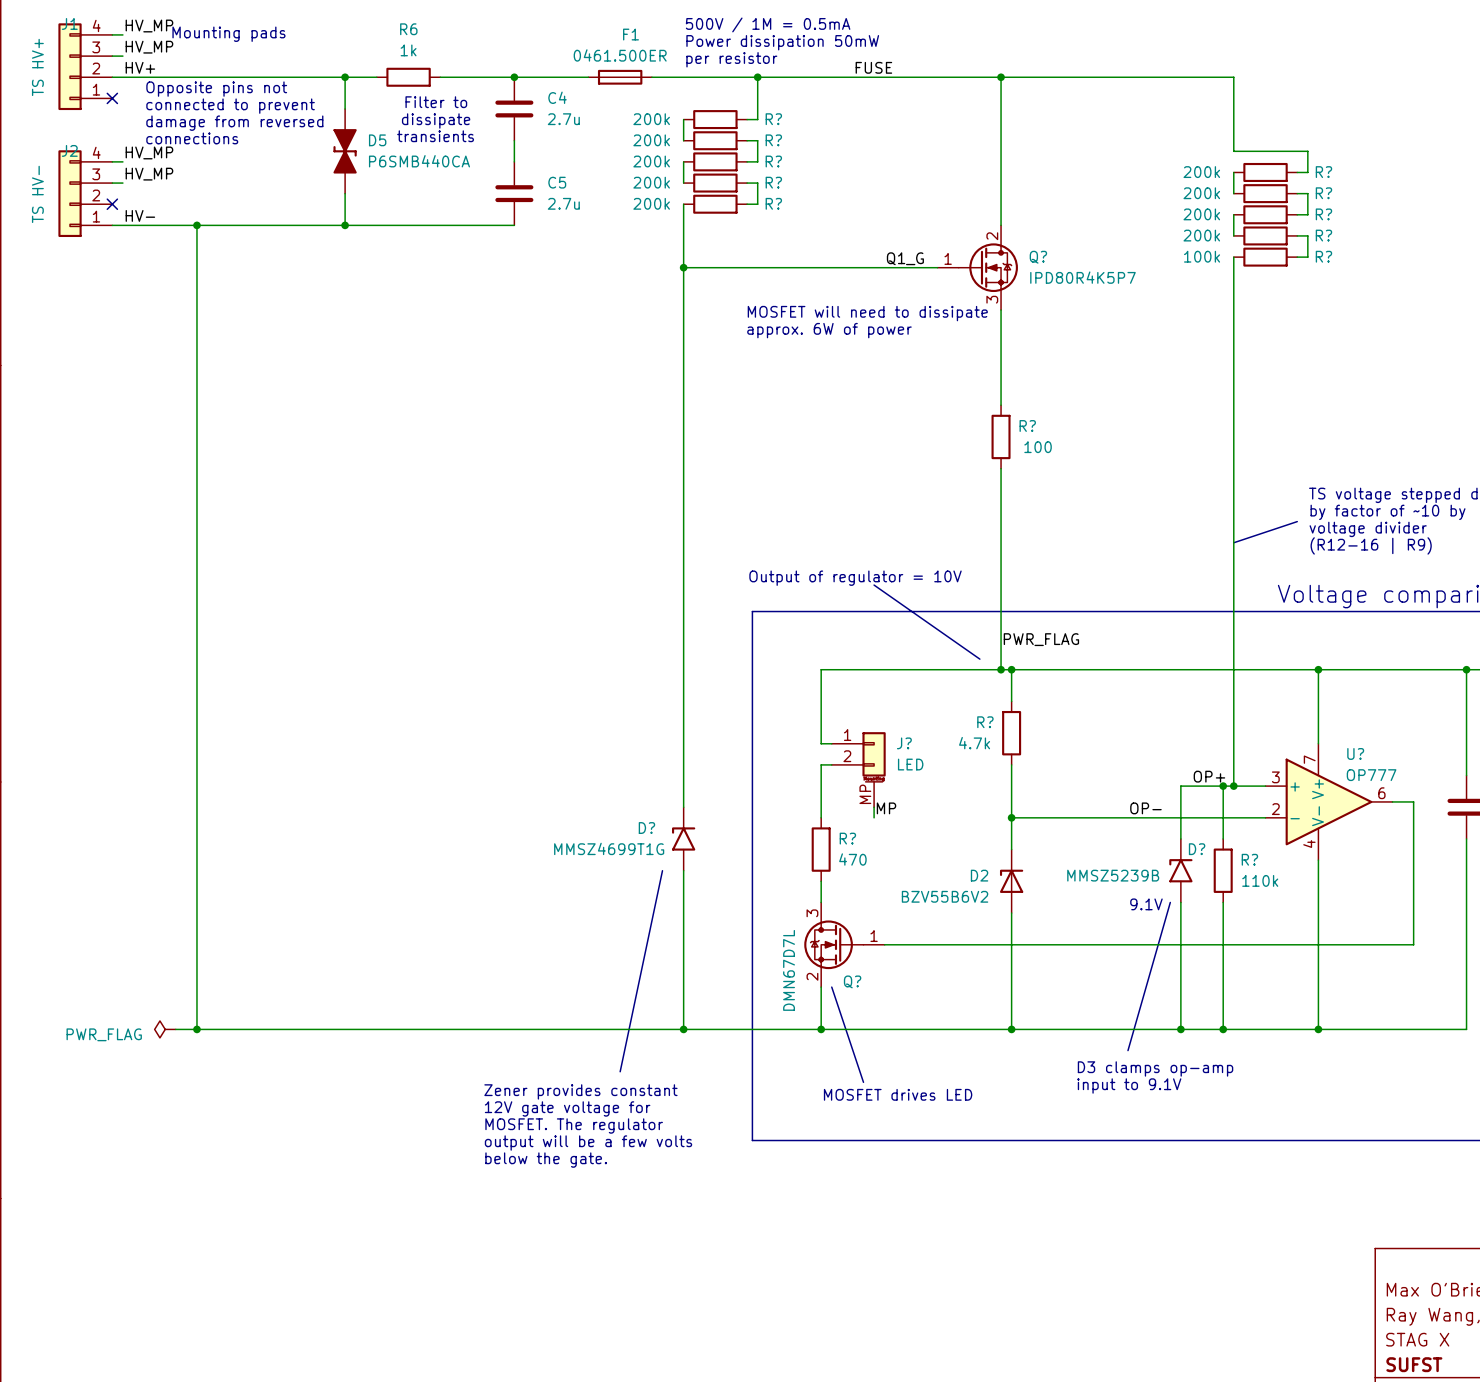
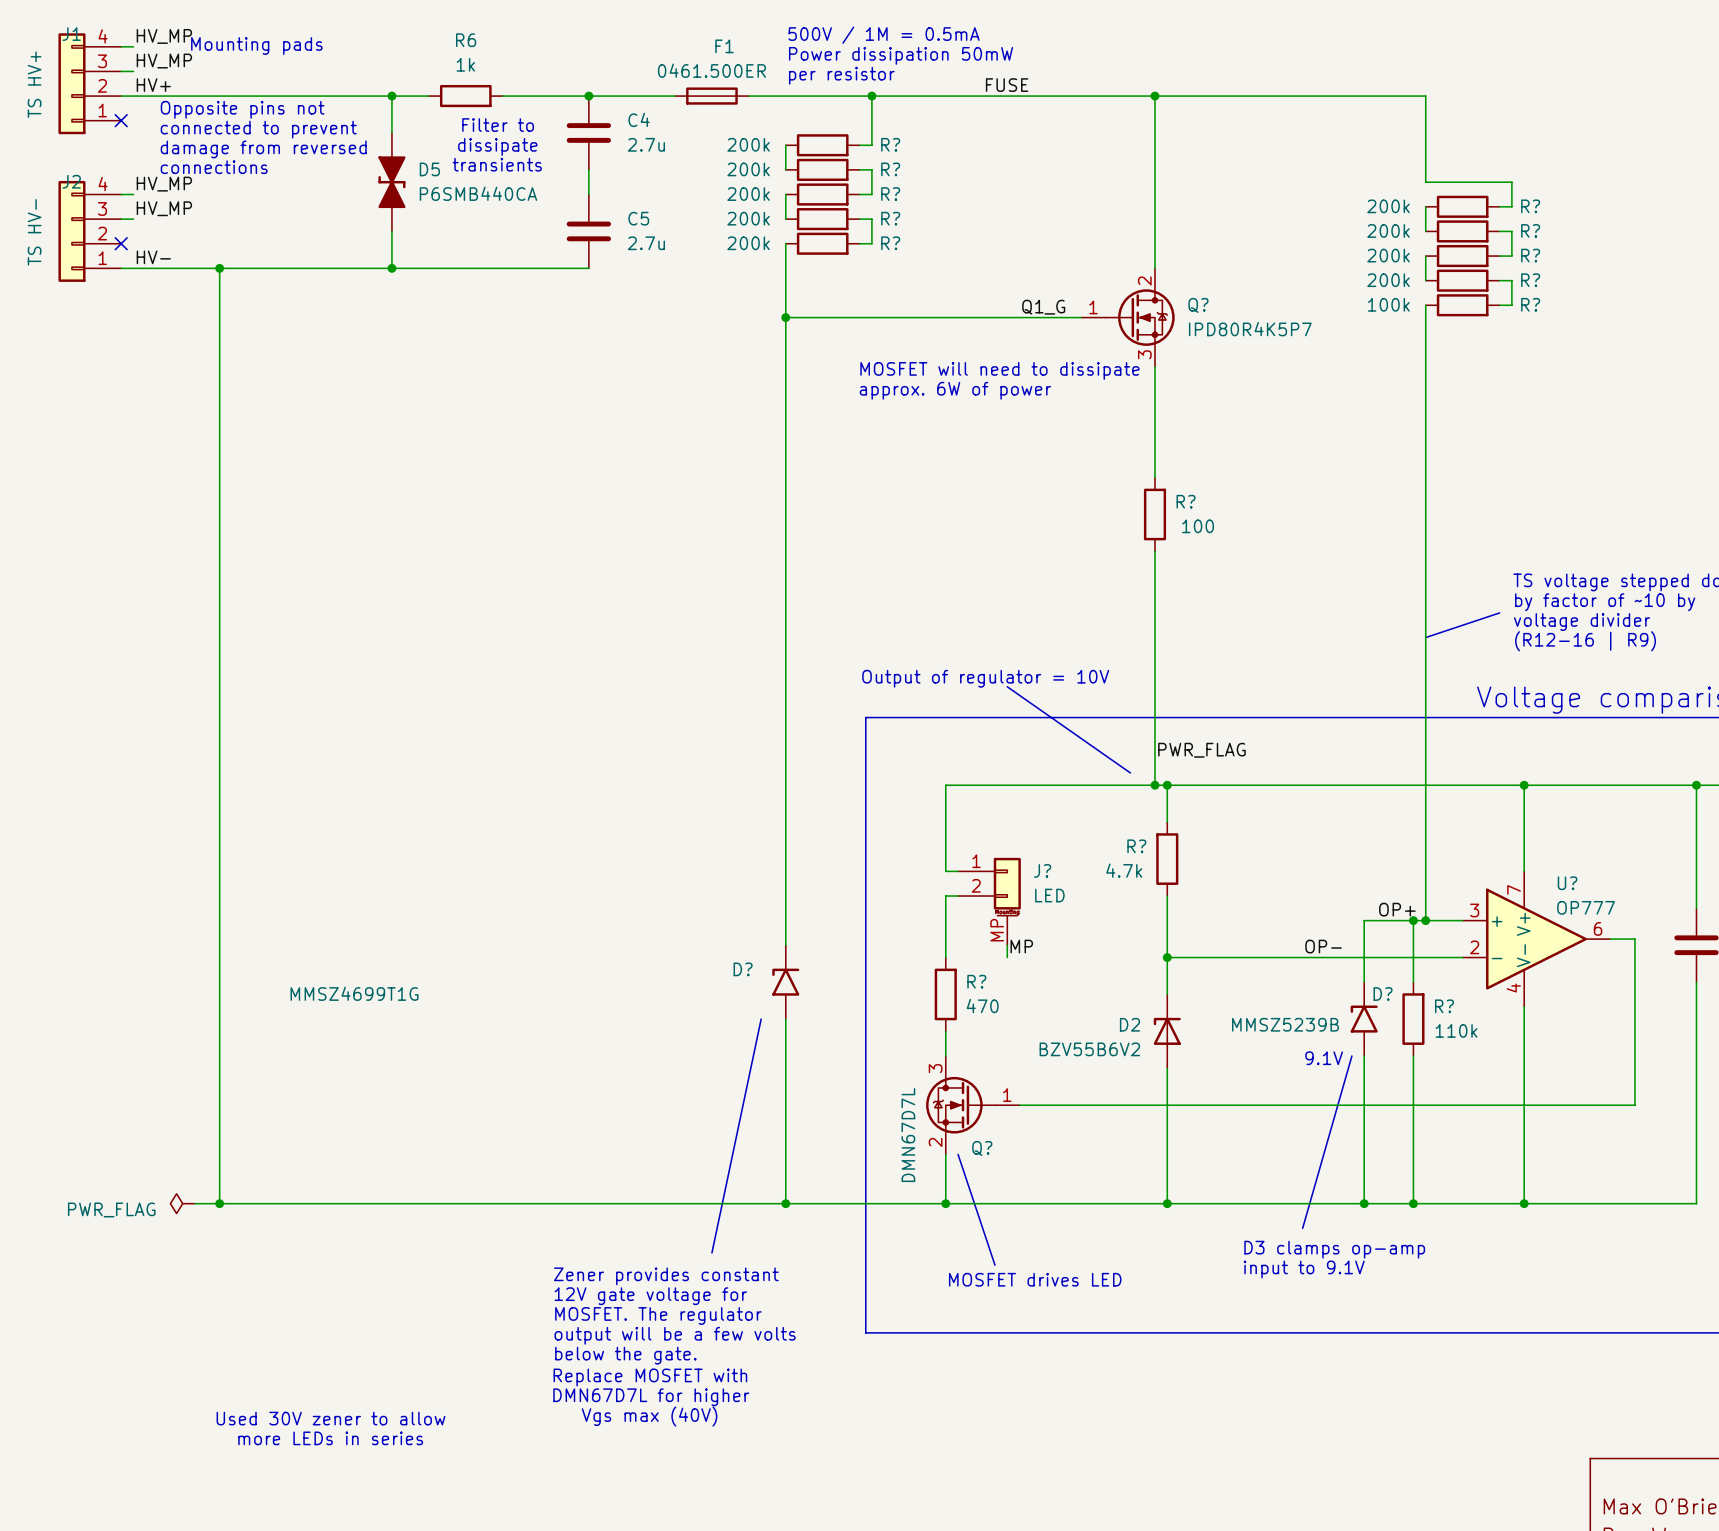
D? value position: MMSZ4699T1G (609, 848) -> MMSZ4699T1G (354, 993)
text: none -> Replace MOSFET with (650, 1377)
text: none -> DMN67D7L for higher (651, 1397)
text: none -> Vgs max (40V) (649, 1416)
text: none -> Used 30V zener to allow (331, 1418)
text: none -> more LEDs in series (330, 1438)

